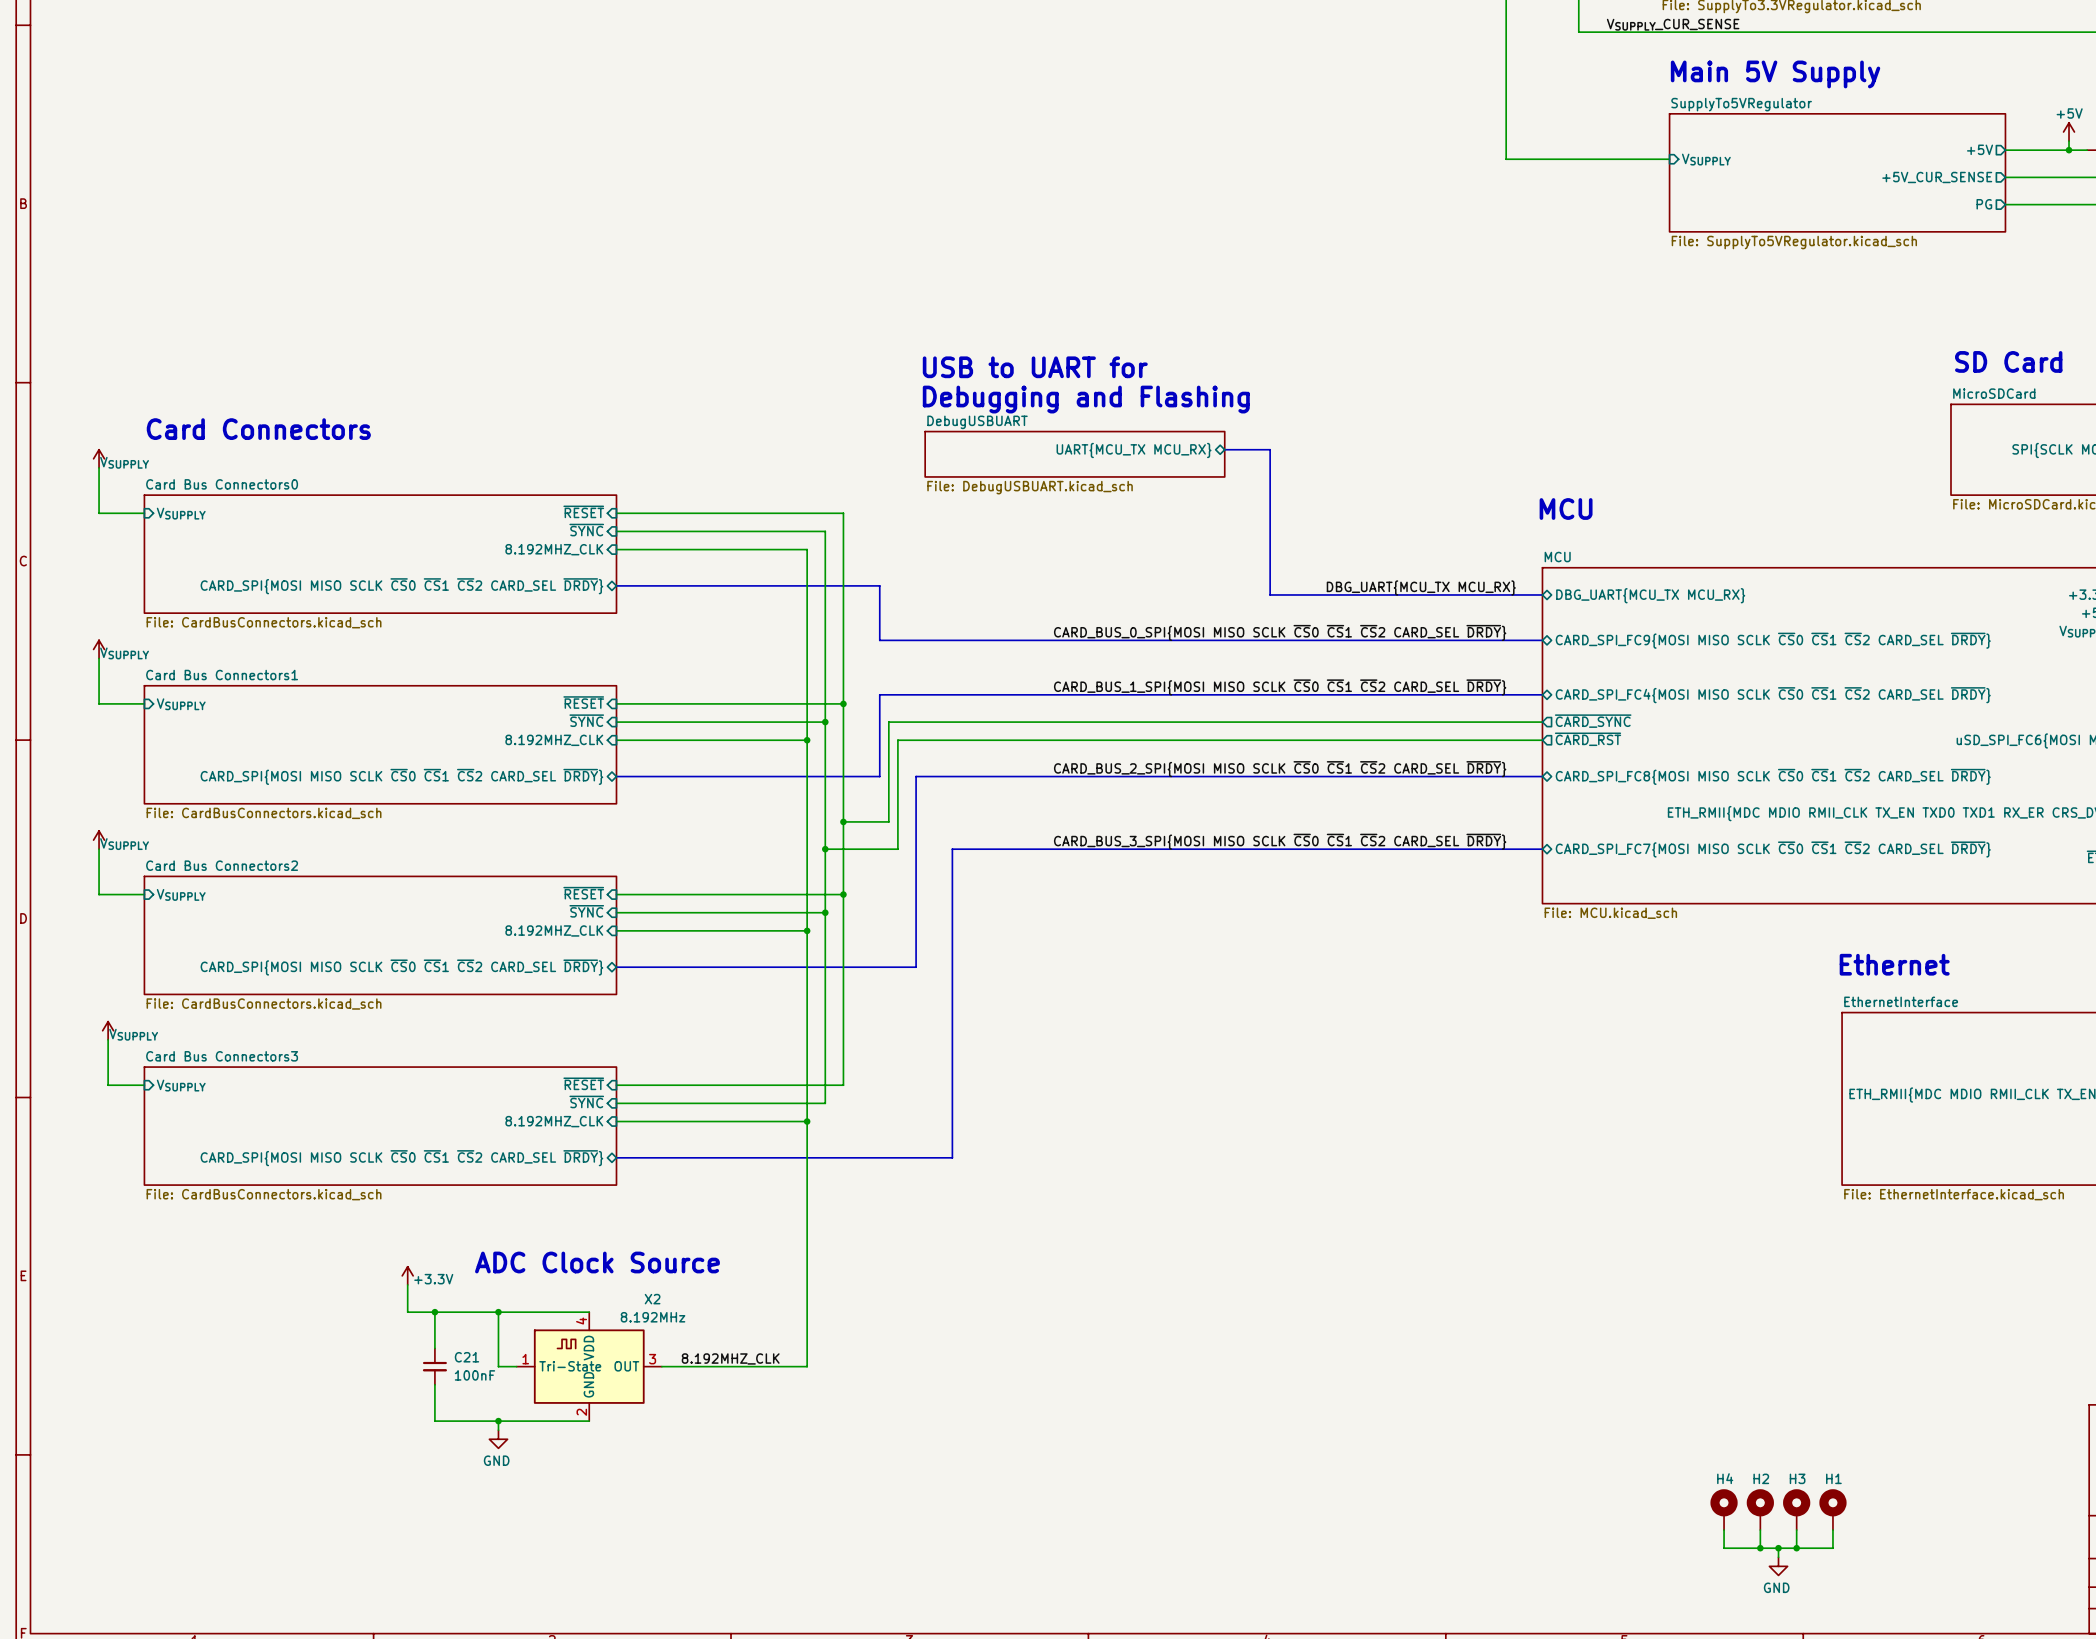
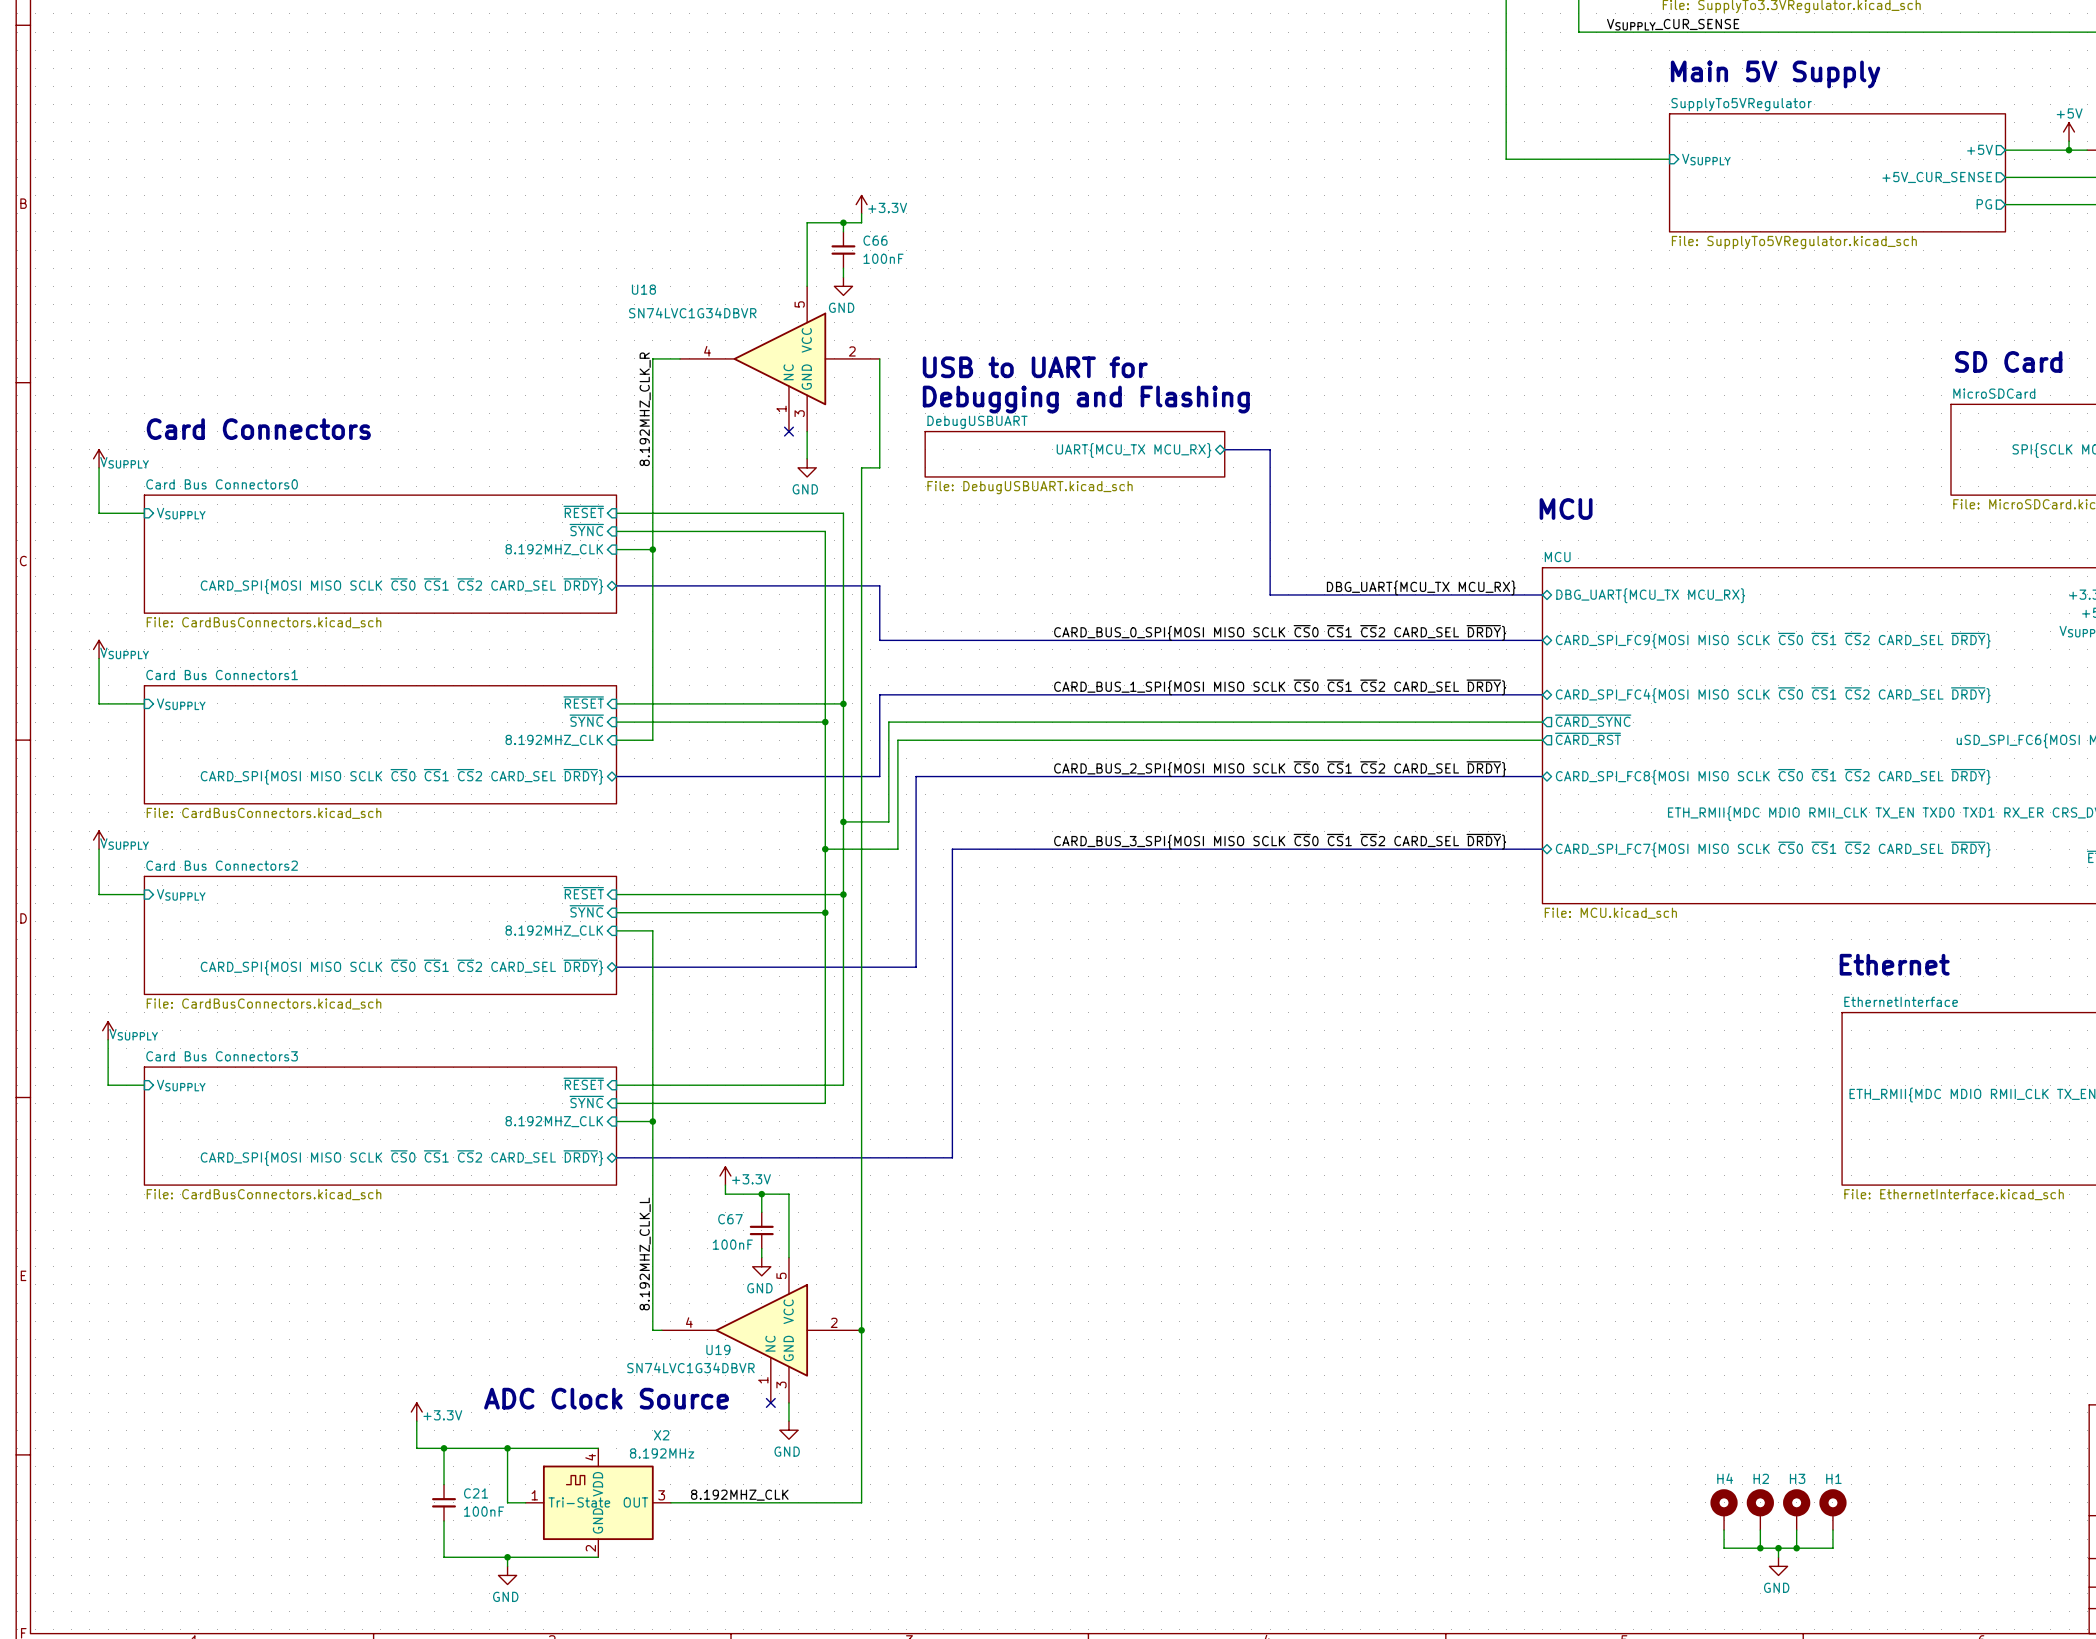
power symbol: none -> +3.3V (861, 204)
wire: none -> (861, 213) (861, 222) (807, 222) (807, 286)
wire: none -> (843, 222) (843, 231)
junction: none -> (843, 222)
C66: none -> 100nF (843, 250)
wire: none -> (843, 268) (843, 277)
power symbol: none -> GND (843, 286)
U18: none -> SN74LVC1G34DBVR (779, 358)
wire: none -> (879, 358) (879, 467) (861, 467) (861, 1502) (670, 1502)
label: none -> 8.192MHZ_CLK_R (645, 409)
no-connect mark: none -> (788, 431)
wire: none -> (807, 431) (807, 458)
power symbol: none -> GND (807, 467)
wire: (652, 549) (807, 549) (807, 1366) (661, 1366) -> none
junction: none -> (652, 549)
wire: (652, 740) (807, 740) -> (652, 740) (652, 358) (680, 358)
junction: (807, 740) -> none
wire: (652, 930) (807, 930) -> (652, 930) (652, 1330) (661, 1330)
junction: (807, 930) -> none
wire: (652, 1121) (807, 1121) -> none
junction: none -> (652, 1121)
junction: (807, 1121) -> none
power symbol: none -> +3.3V (725, 1175)
wire: none -> (725, 1185) (725, 1194) (788, 1194) (788, 1257)
wire: none -> (761, 1194) (761, 1212)
junction: none -> (761, 1194)
C67: none -> 100nF (761, 1230)
wire: none -> (761, 1248) (761, 1257)
label: none -> 8.192MHZ_CLK_L (645, 1253)
text position: ADC Clock Source (597, 1262) -> ADC Clock Source (606, 1398)
power symbol: none -> GND (761, 1266)
power symbol position: +3.3V (407, 1275) -> +3.3V (416, 1412)
wire: (407, 1284) (407, 1312) (589, 1312) -> (416, 1421) (416, 1448) (598, 1448)
wire: (434, 1312) (434, 1348) -> (444, 1448) (444, 1484)
junction: (434, 1312) -> none
wire: (498, 1312) (498, 1366) (516, 1366) -> (507, 1448) (507, 1502) (525, 1502)
junction: (498, 1312) -> none
U19: none -> SN74LVC1G34DBVR (761, 1330)
junction: none -> (861, 1330)
C21 symbol: [422, 1348, 448, 1385] -> [432, 1484, 456, 1521]
label position: 8.192MHZ_CLK (730, 1358) -> 8.192MHZ_CLK (739, 1495)
X2 position: (589, 1366) -> (598, 1502)
wire: (434, 1384) (434, 1421) (589, 1421) -> (444, 1520) (444, 1557) (598, 1557)
no-connect mark: none -> (770, 1402)
wire: none -> (788, 1402) (788, 1421)
wire: (498, 1421) (498, 1430) -> (507, 1557) (507, 1566)
junction position: (498, 1421) -> (507, 1448)
power symbol: none -> GND (788, 1430)
power symbol position: GND (498, 1439) -> GND (507, 1575)
junction: none -> (444, 1448)
junction: none -> (507, 1557)

